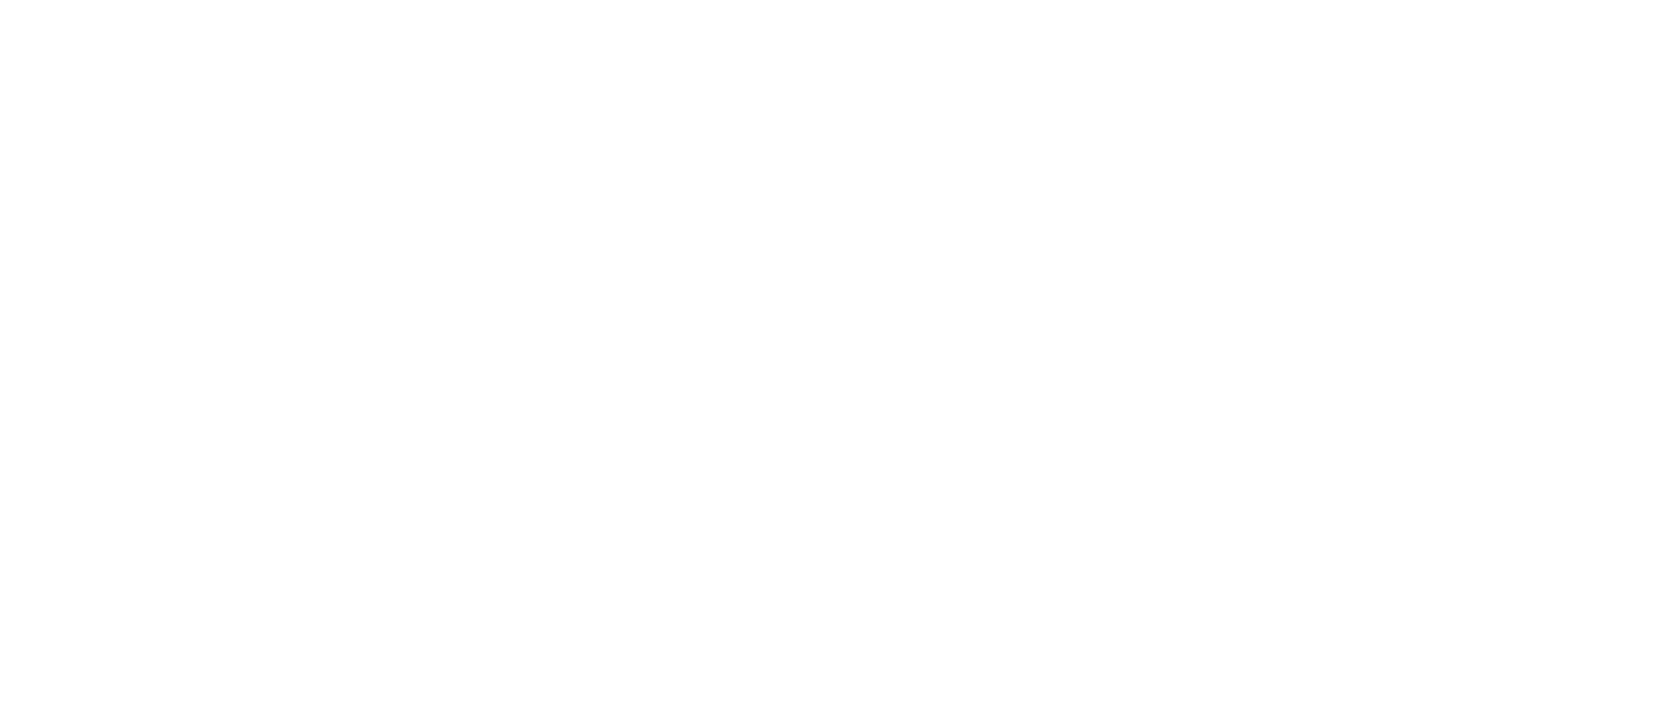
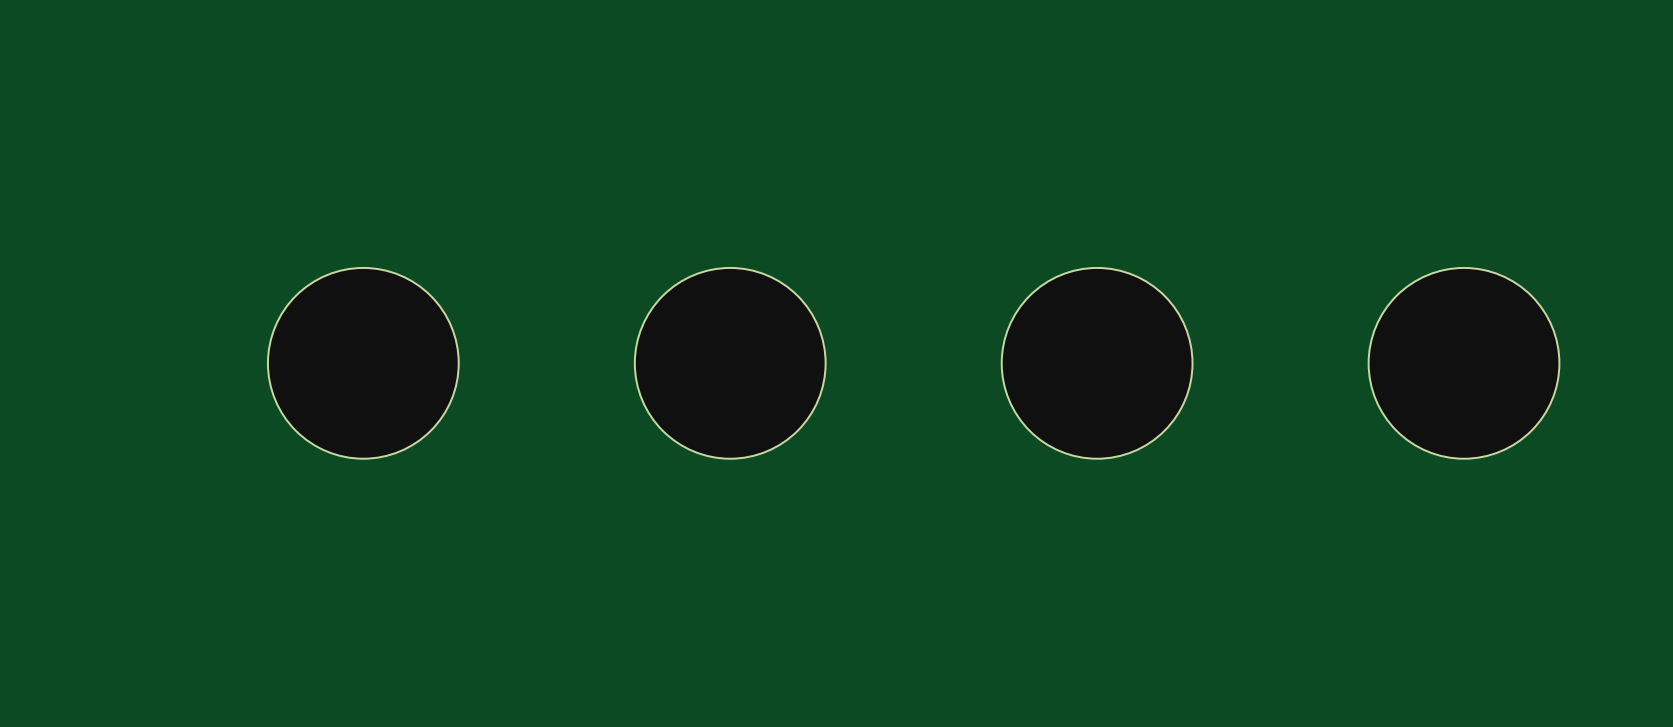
part: none -> (363, 363)
part: none -> (730, 363)
part: none -> (1097, 363)
part: none -> (1464, 363)

